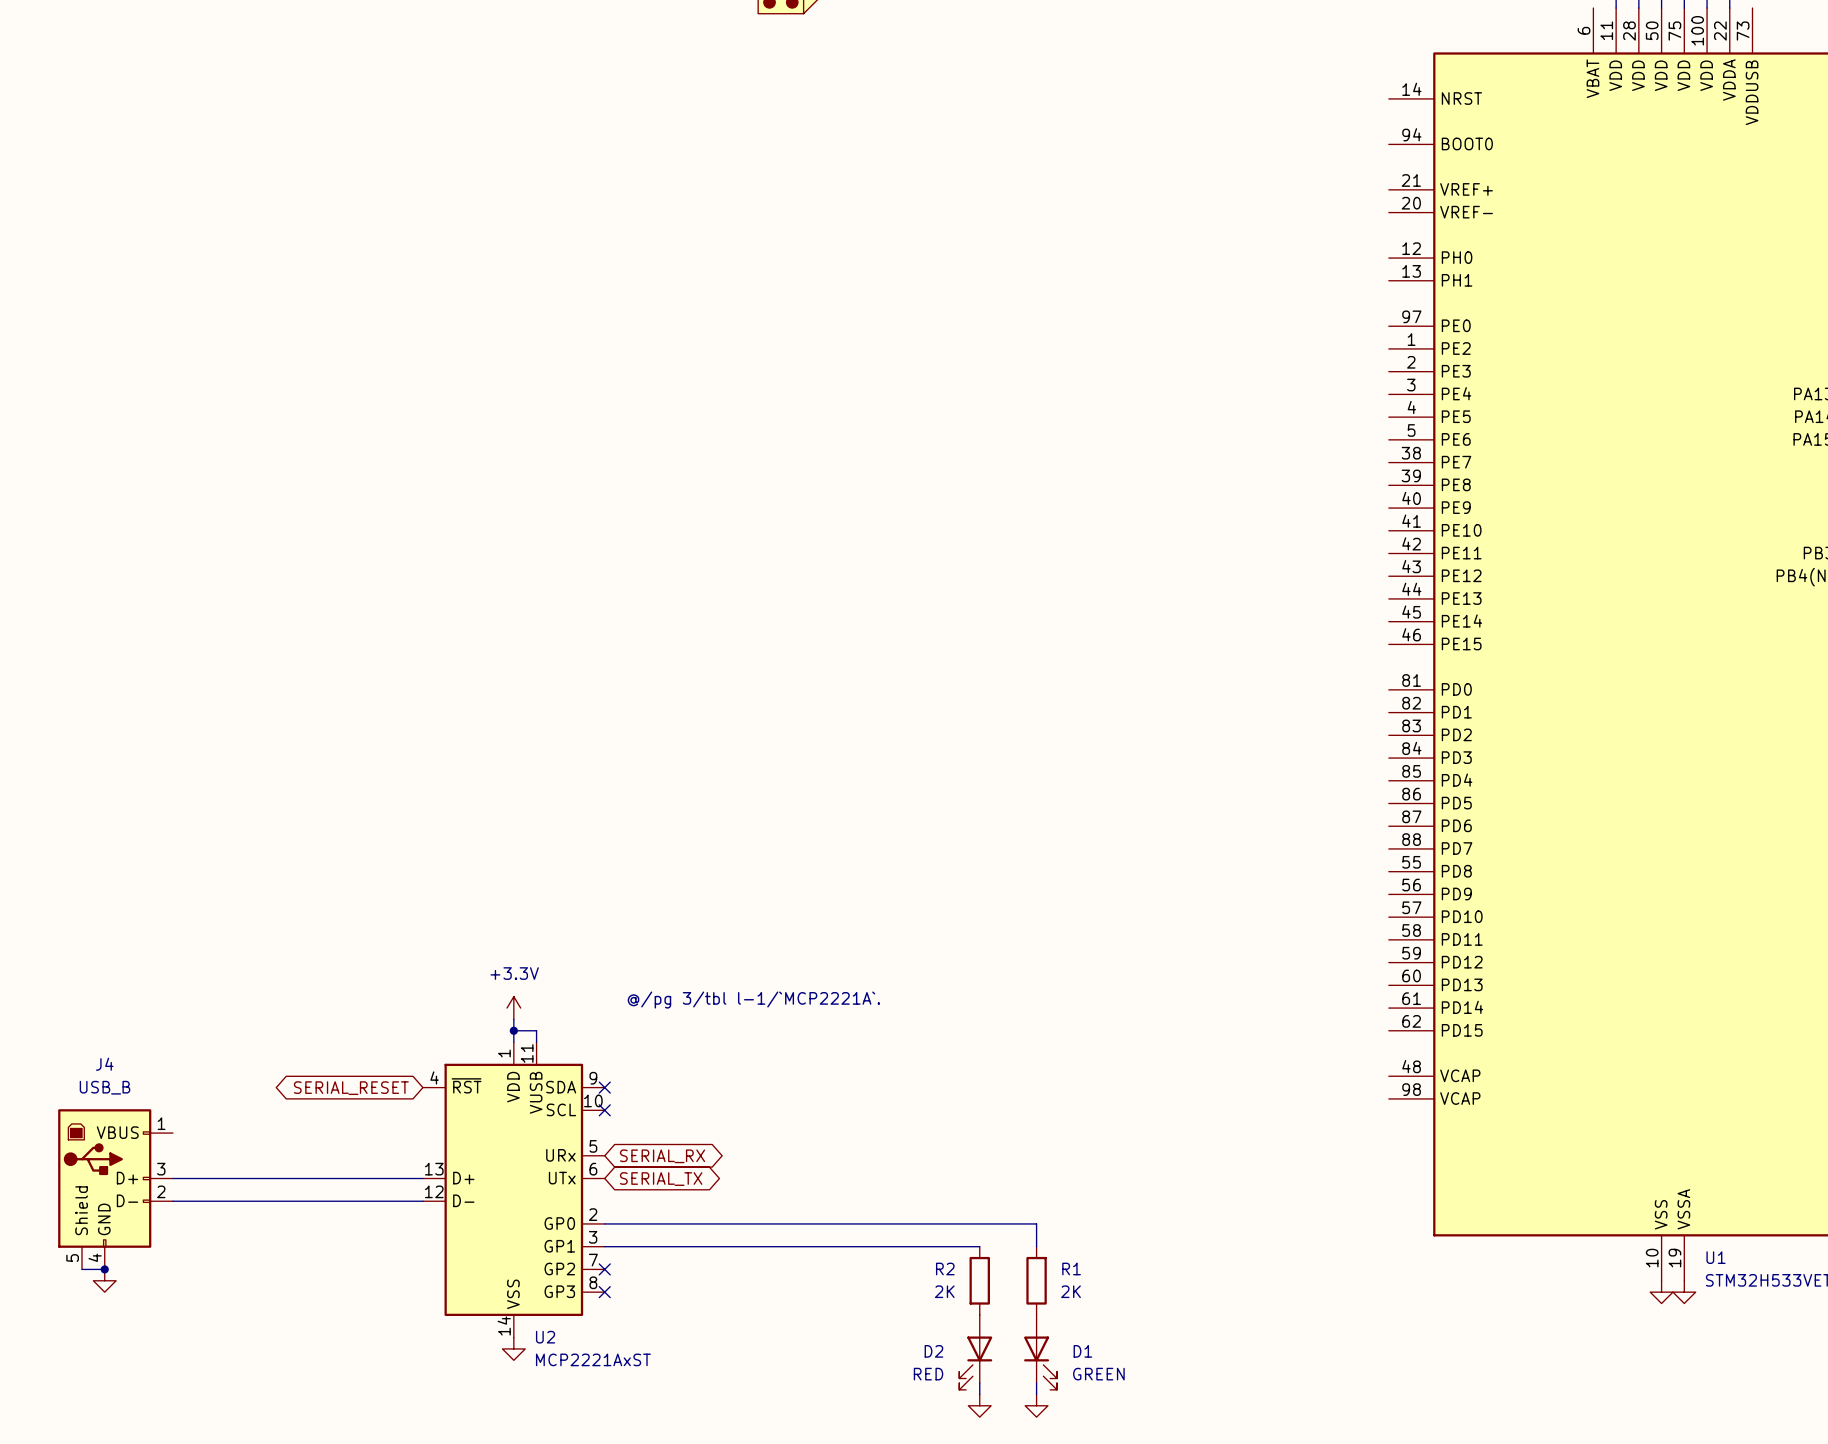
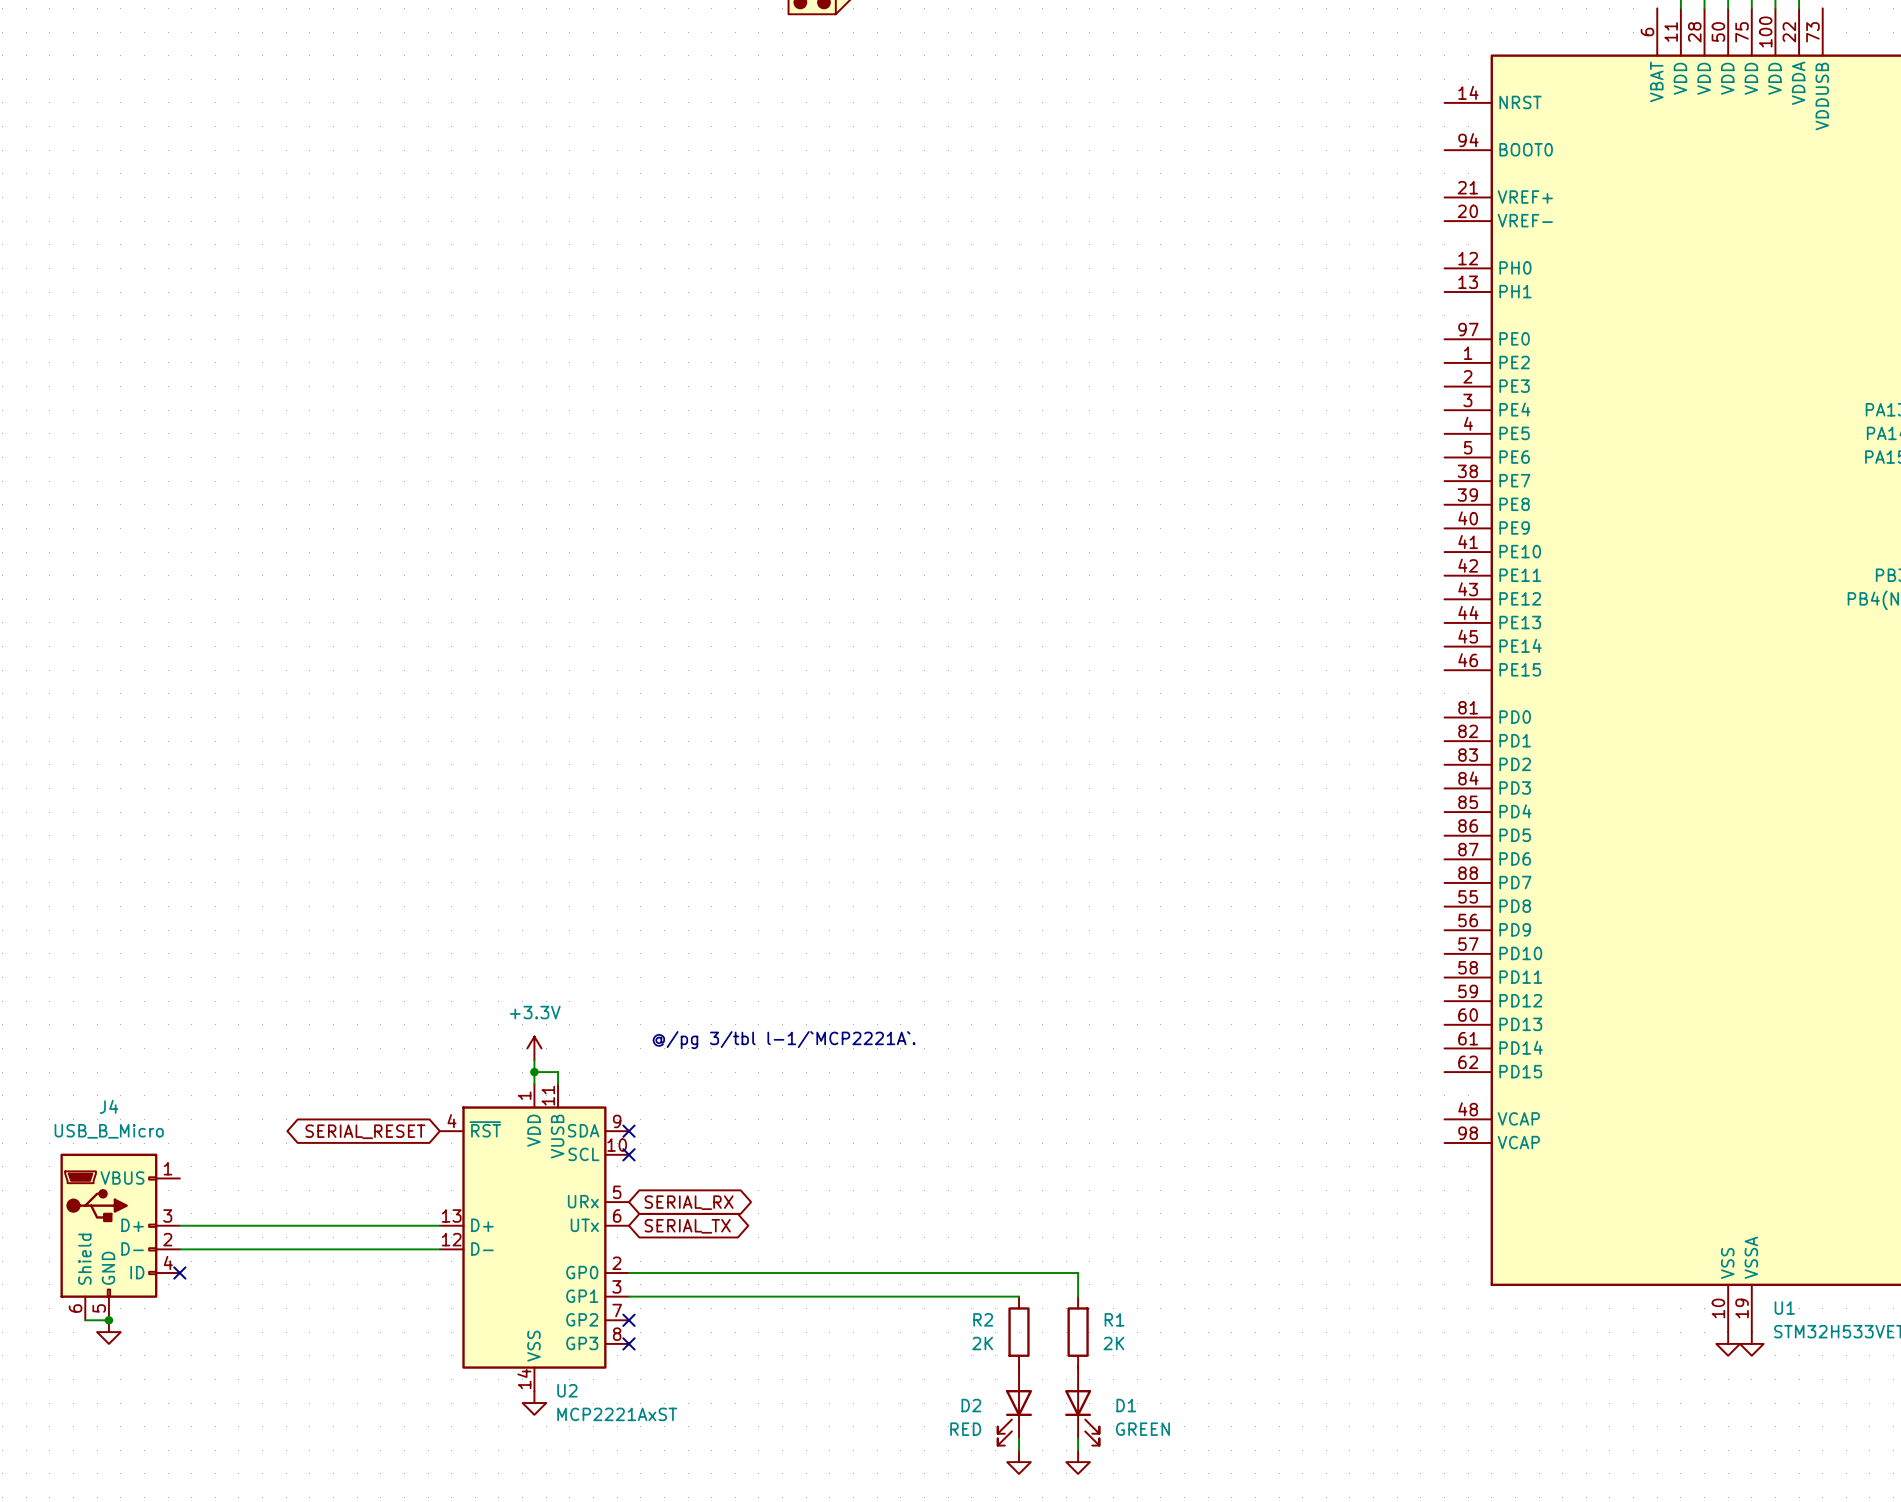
J4 value: USB_B (105, 1087) -> USB_B_Micro (109, 1131)
J4 symbol: [58, 1109, 173, 1270] -> [60, 1153, 180, 1321]
no-connect mark: none -> (179, 1273)

